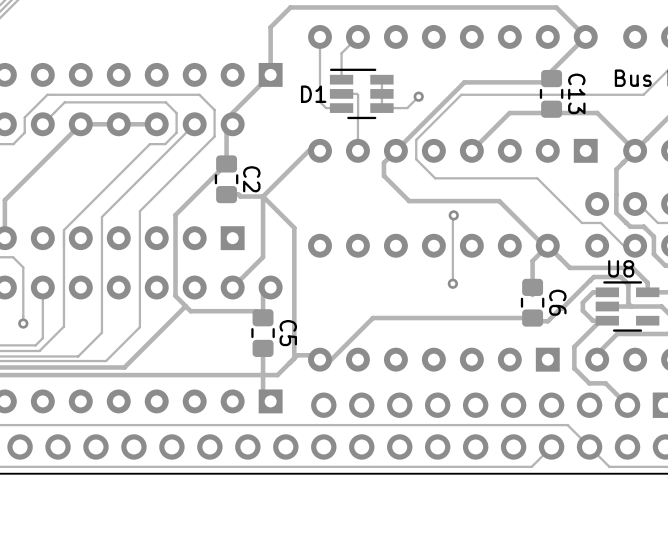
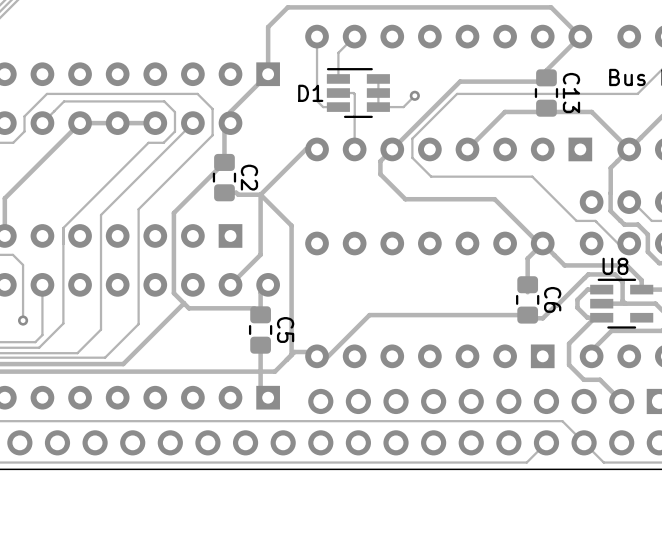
track: (453, 215) (452, 283) -> none
via: (453, 215) -> none
via: (452, 283) -> none

